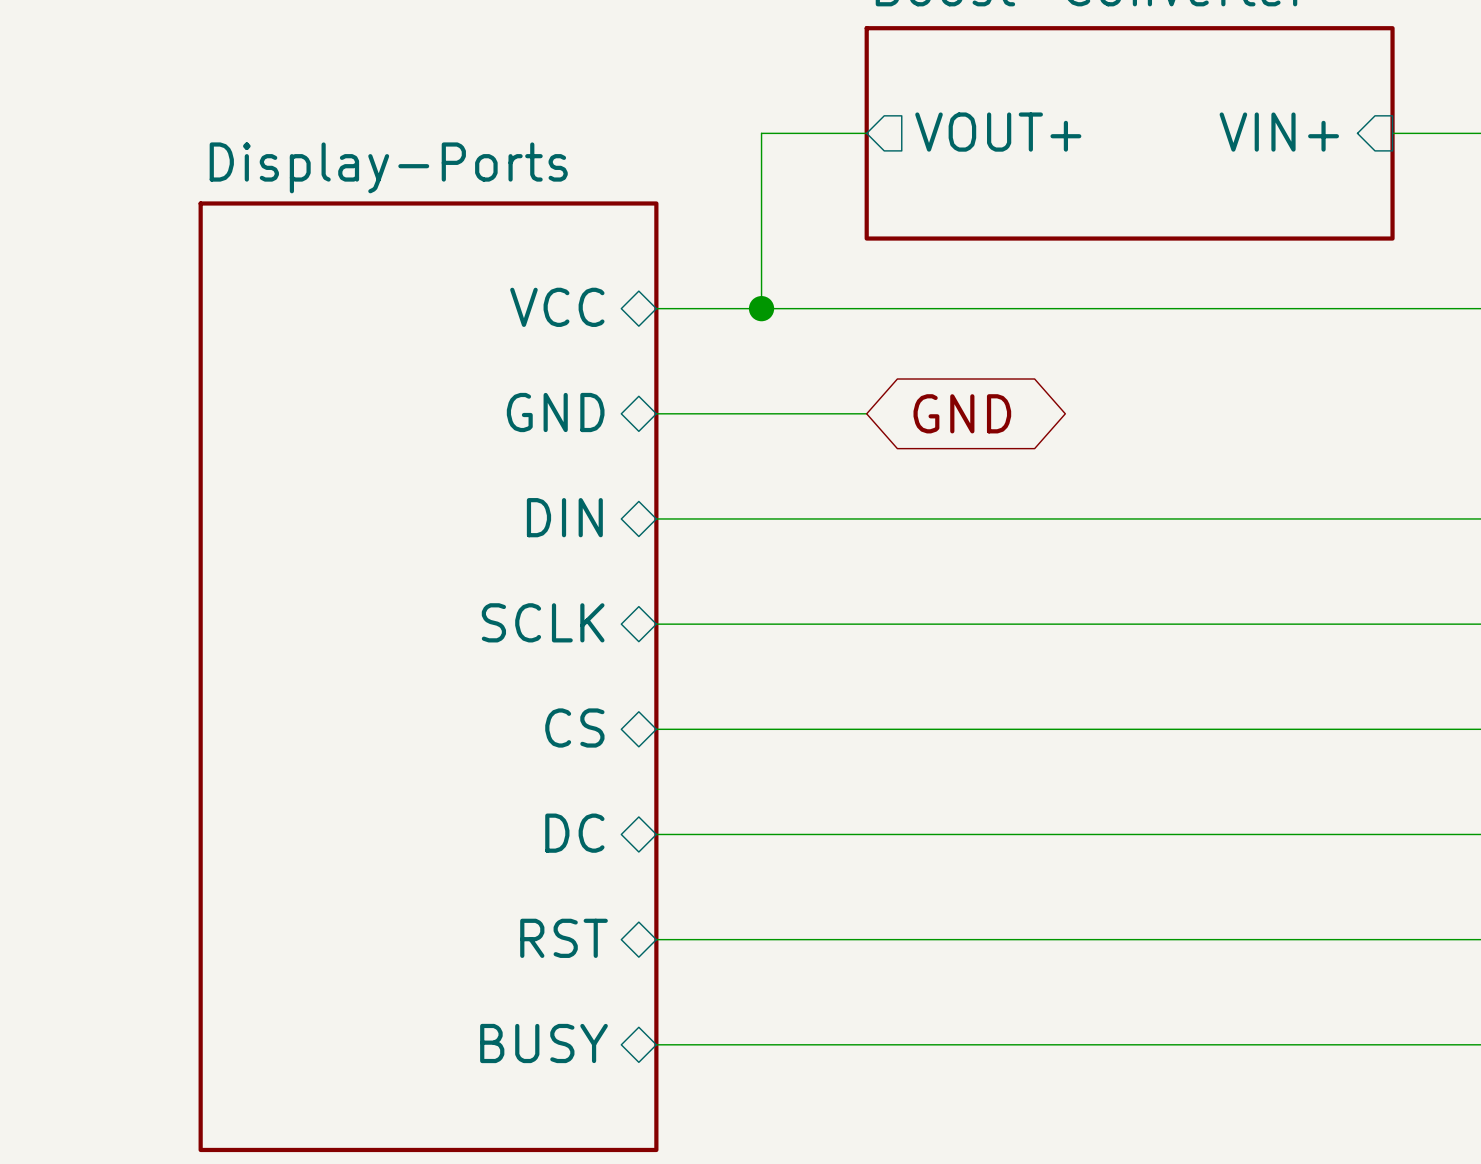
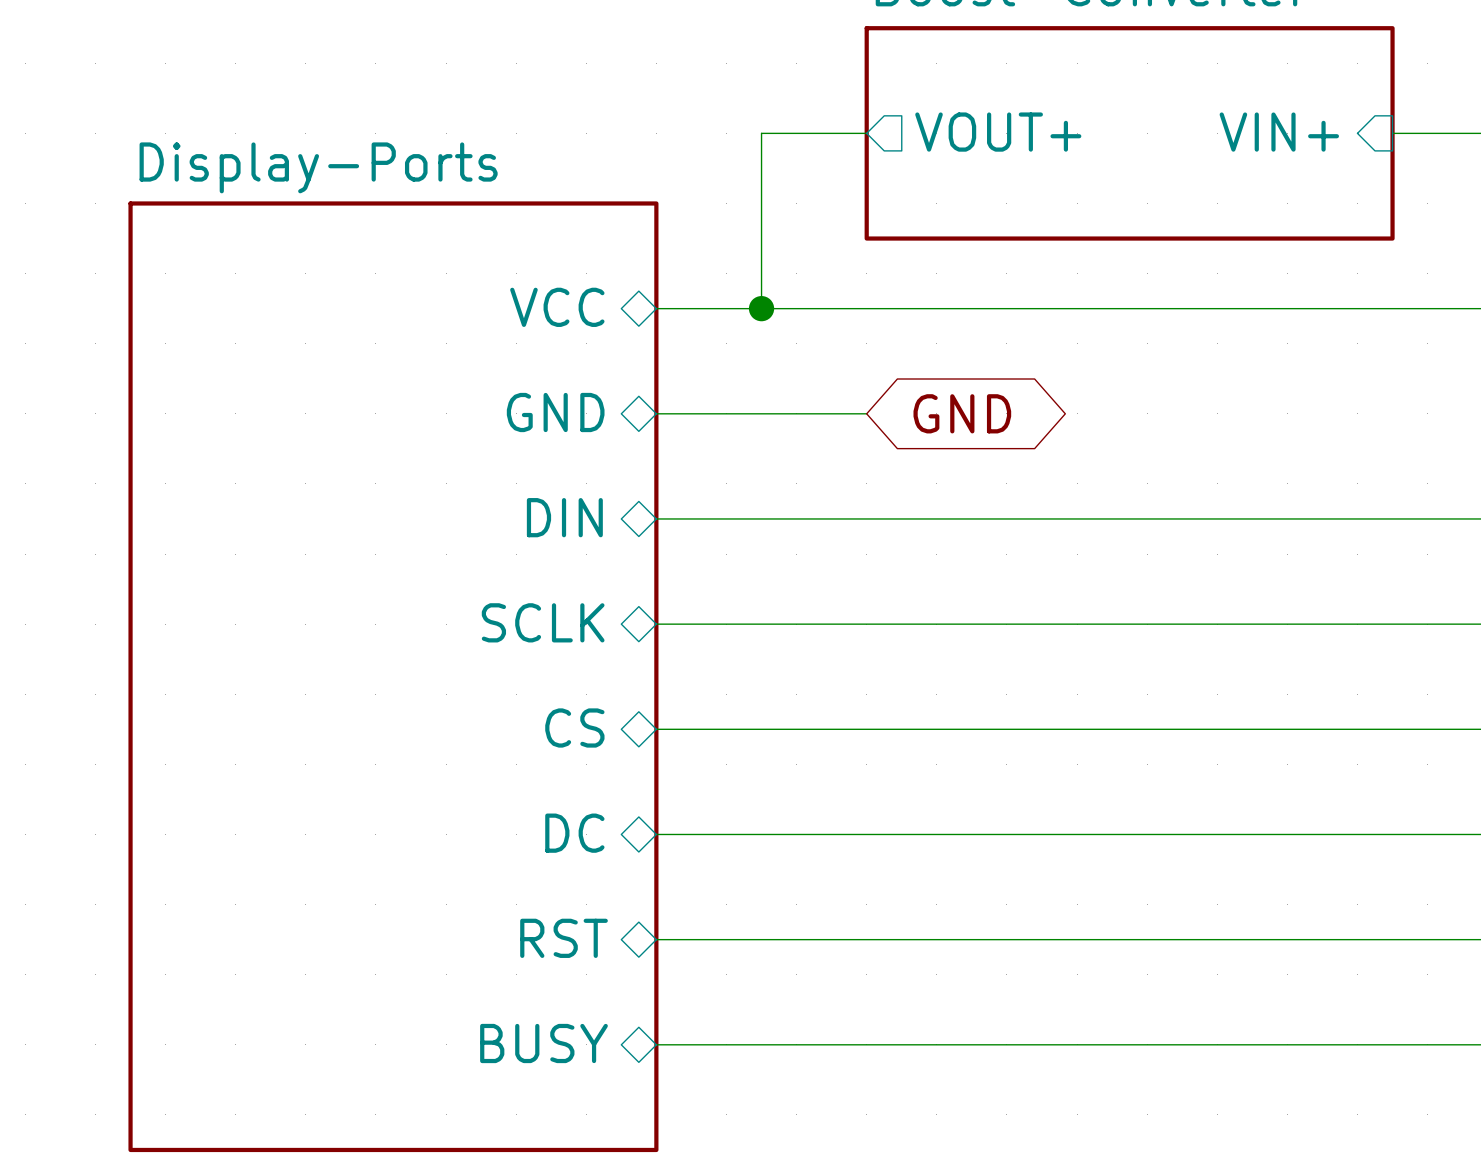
sheet Display-Ports: none -> (393, 676)
sheet Display-Ports: (428, 676) -> none

